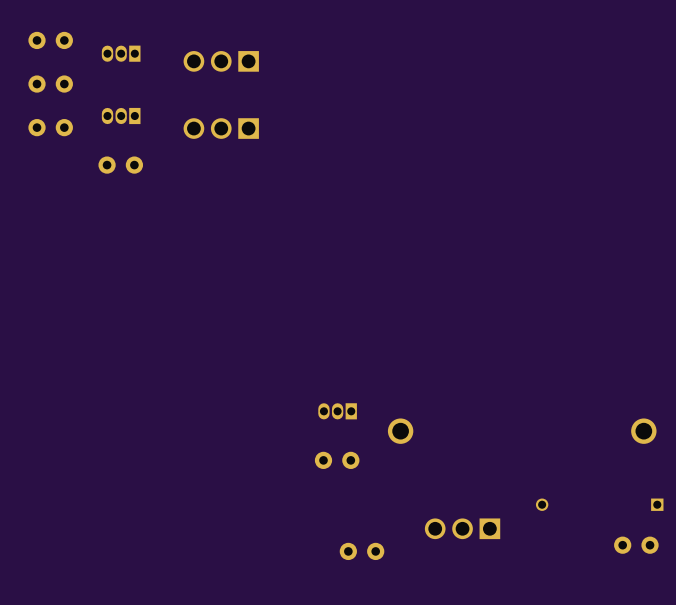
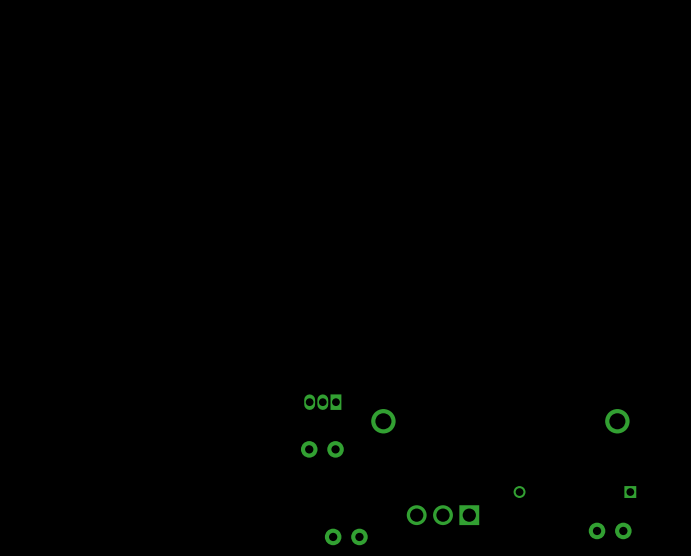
part: (50, 40) -> none
part: (121, 53) -> none
part: (221, 61) -> none
part: (50, 84) -> none
part: (121, 116) -> none
part: (50, 127) -> none
part: (221, 128) -> none
part: (120, 165) -> none

